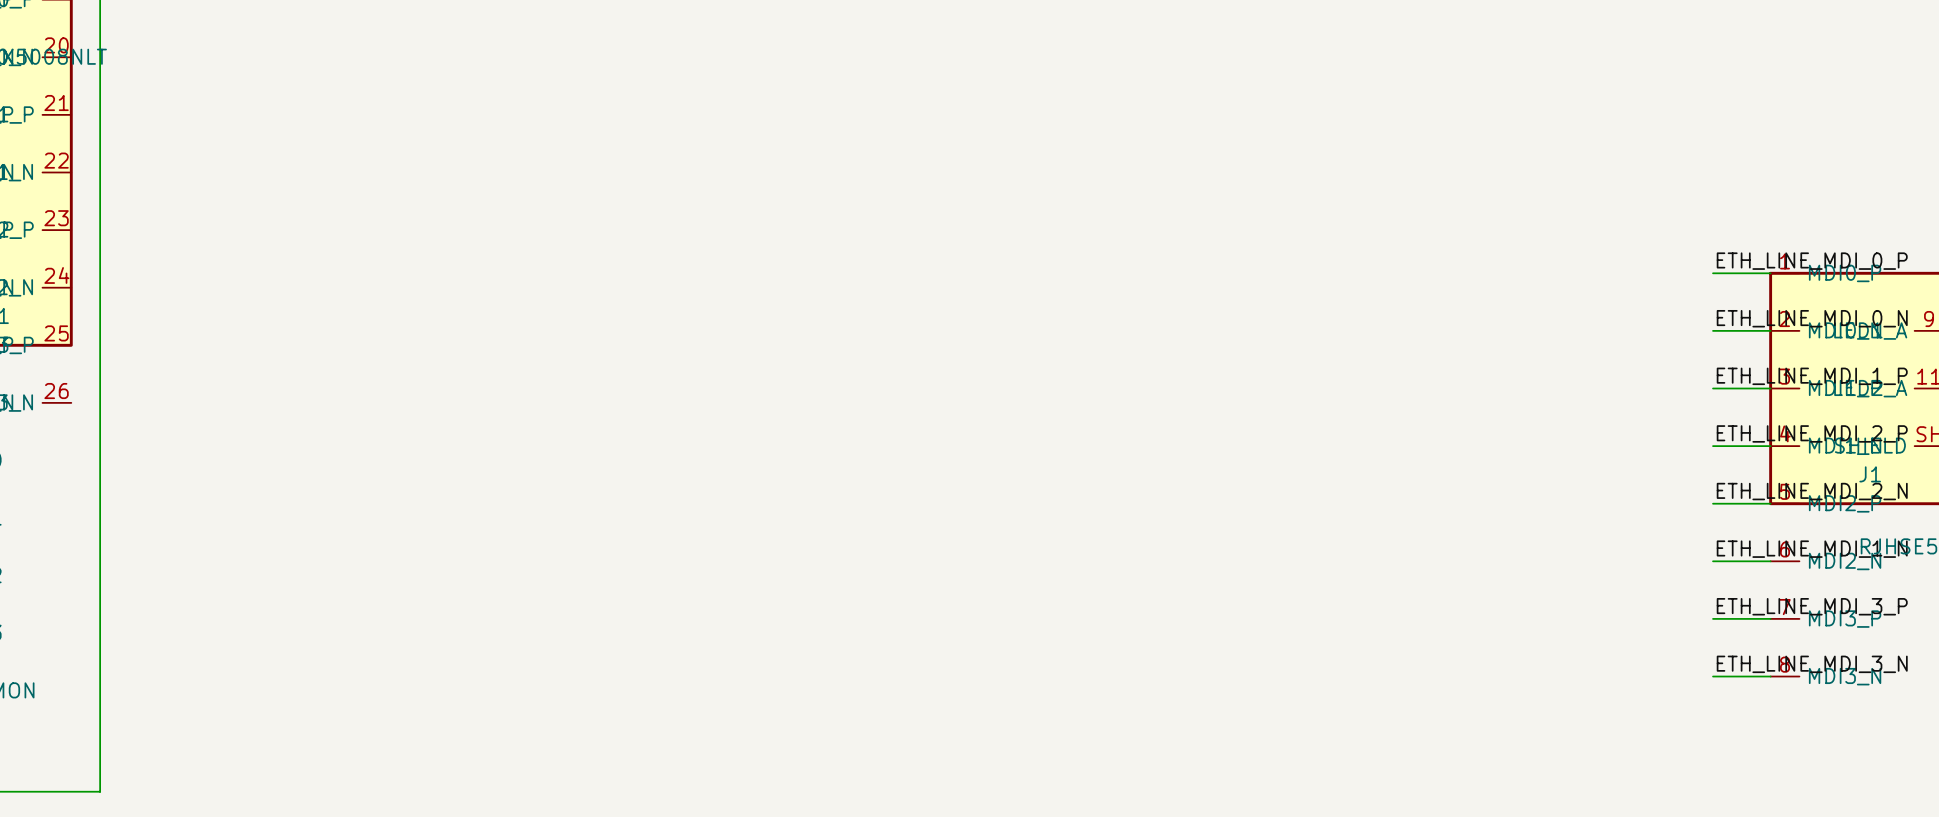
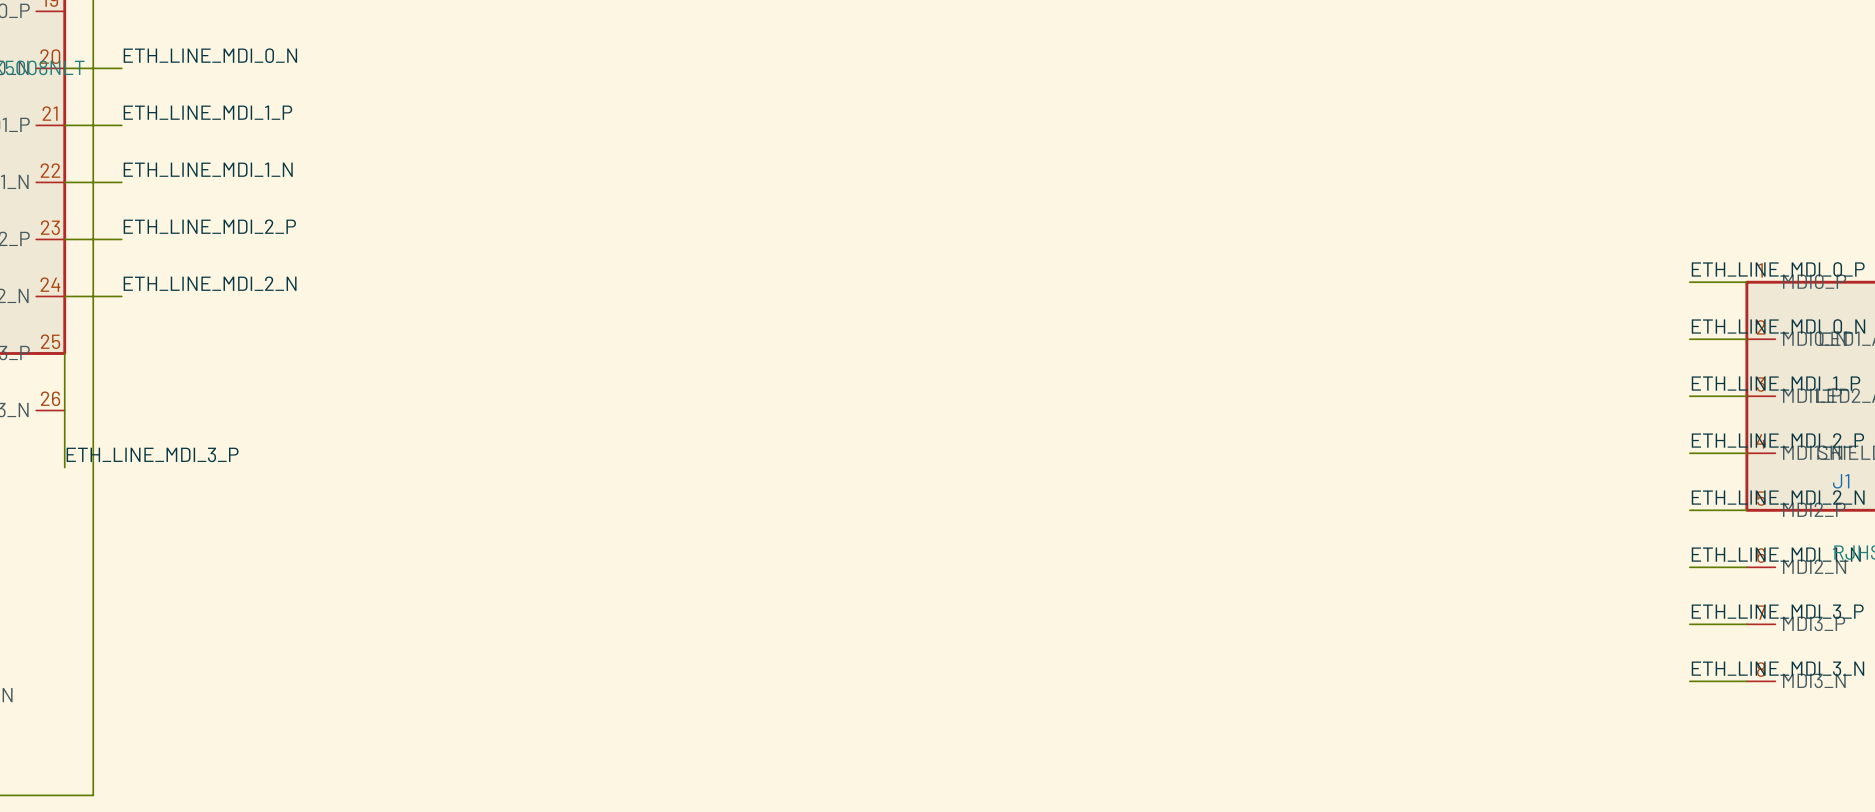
label: none -> ETH_LINE_MDI_0_N (210, 55)
wire: none -> (64, 68) (121, 68)
label: none -> ETH_LINE_MDI_1_P (207, 112)
wire: none -> (64, 125) (121, 125)
label: none -> ETH_LINE_MDI_1_N (208, 169)
wire: none -> (64, 182) (121, 182)
label: none -> ETH_LINE_MDI_2_P (209, 226)
wire: none -> (64, 239) (121, 239)
label: none -> ETH_LINE_MDI_2_N (210, 283)
wire: none -> (64, 296) (121, 296)
wire: none -> (64, 353) (64, 467)
label: none -> ETH_LINE_MDI_3_P (152, 454)

